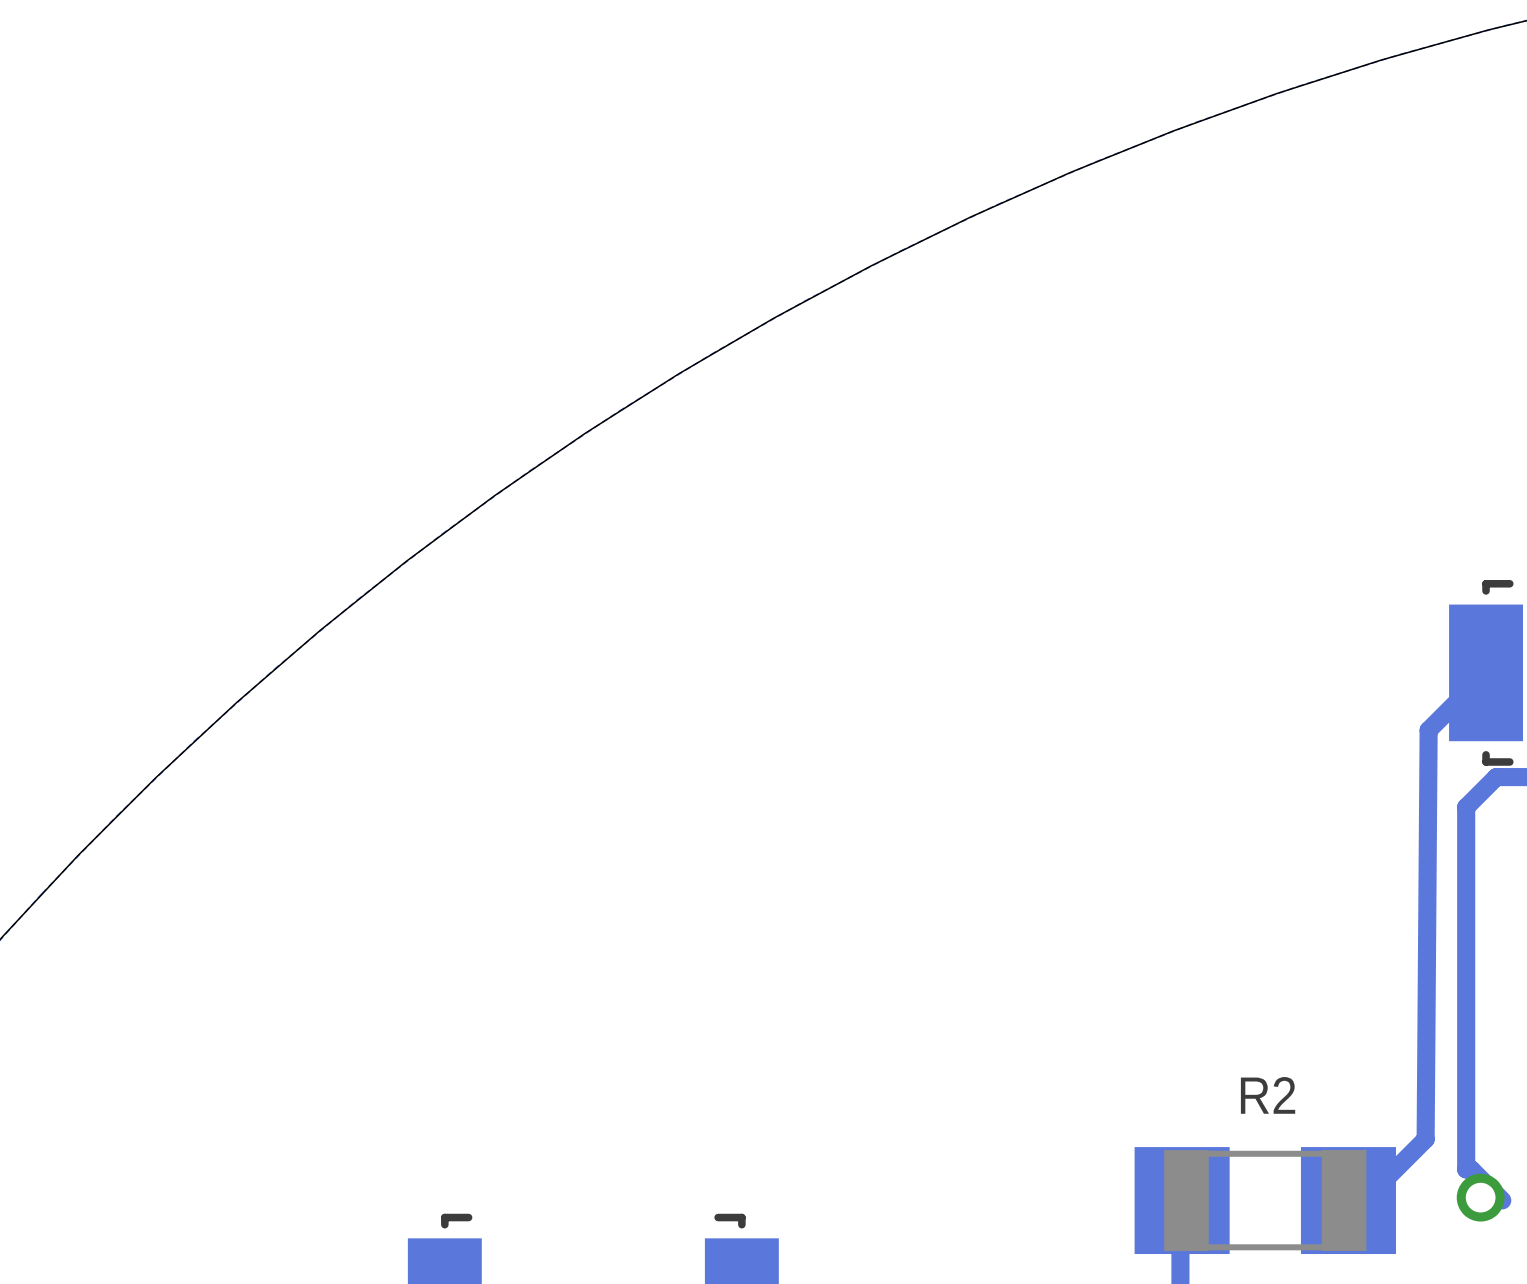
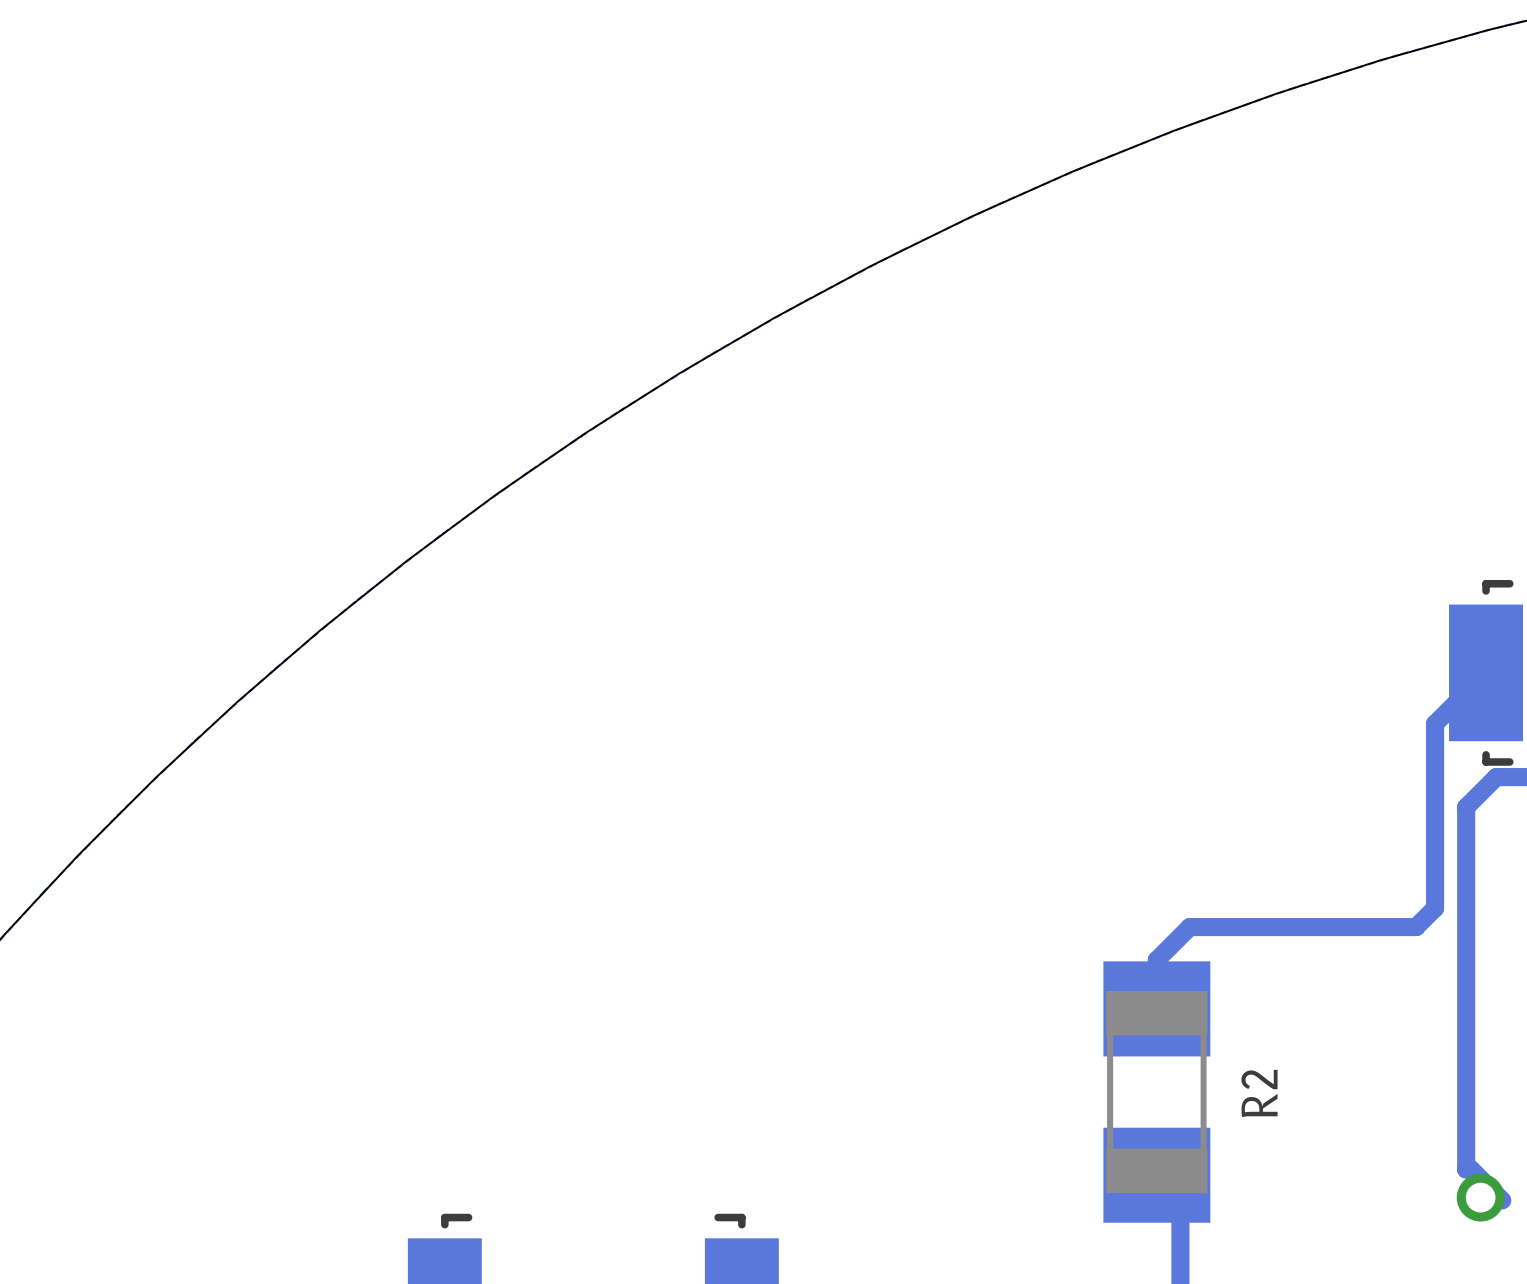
track: (1435, 723) (1428, 730) (1425, 1139) (1364, 1200) (1348, 1200) -> (1435, 723) (1435, 908) (1416, 927) (1189, 927) (1156, 960) (1155, 985) (1156, 1008)
R2 rotation: 0° (1265, 1200) -> 90° clockwise (1156, 1092)

